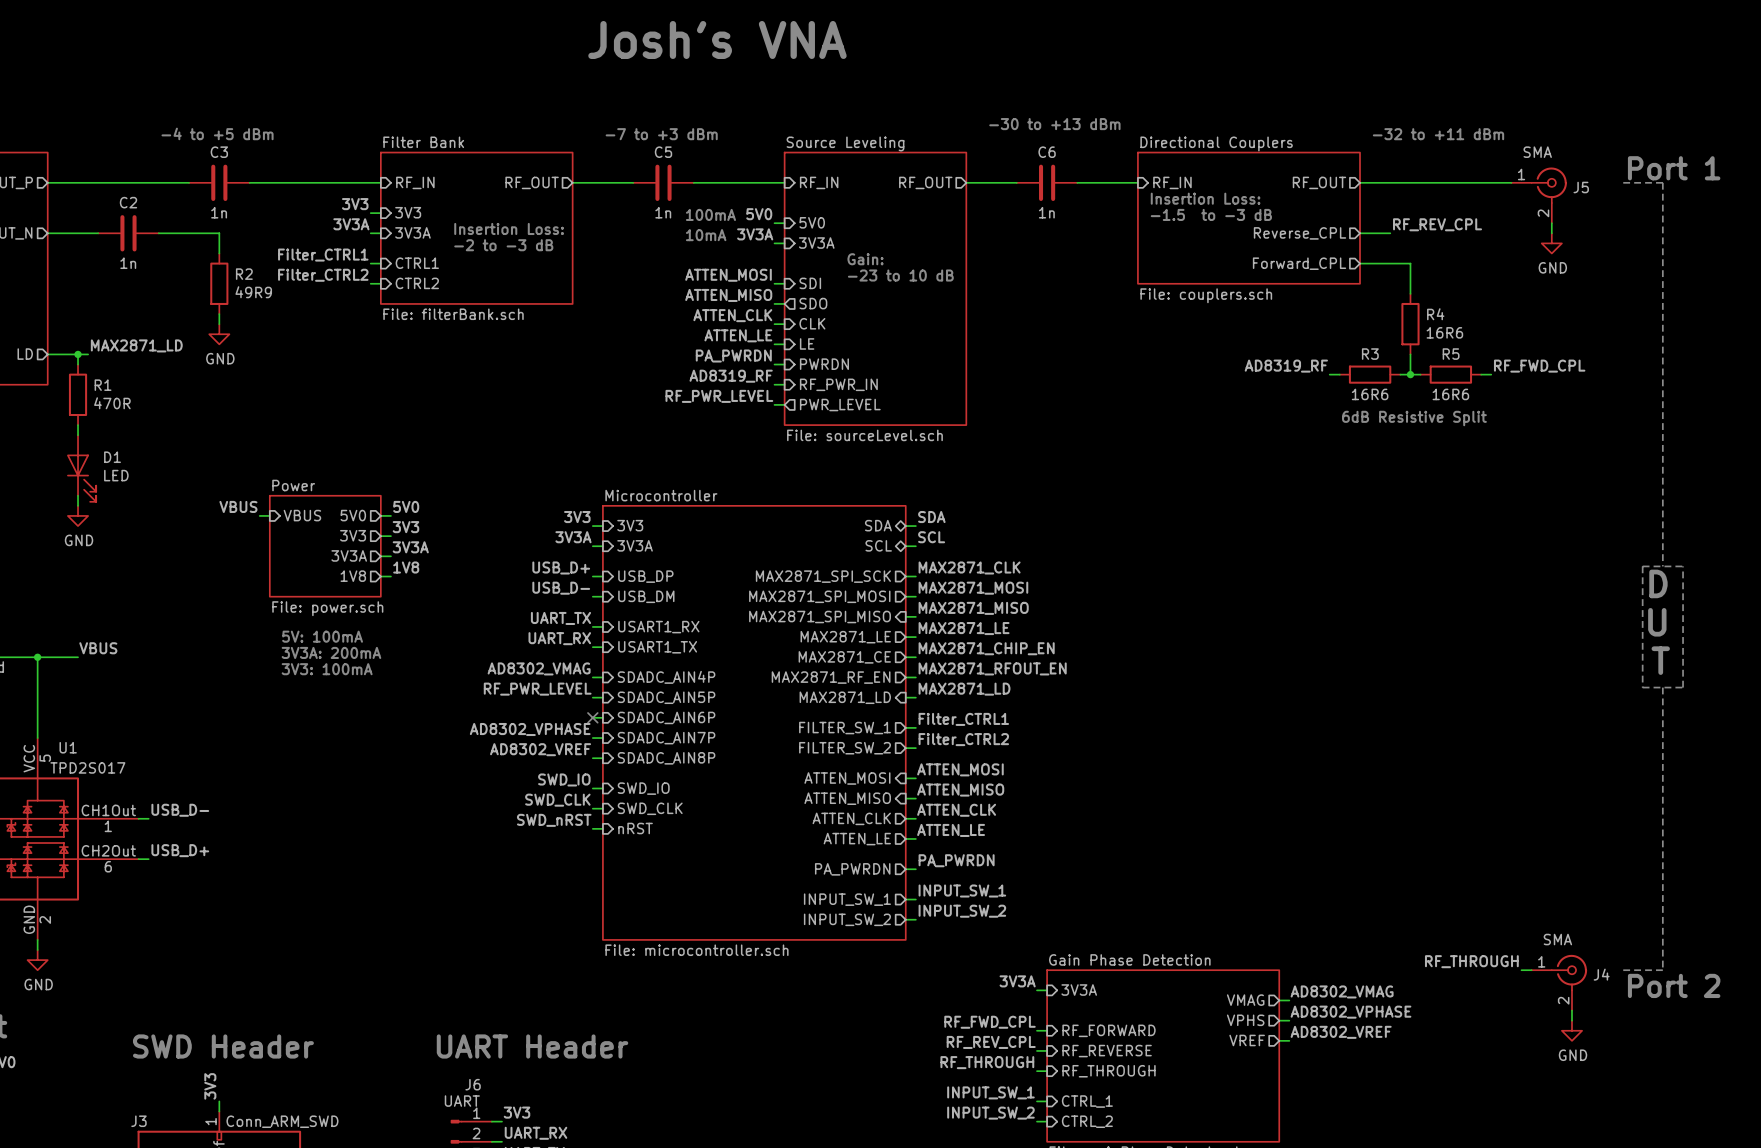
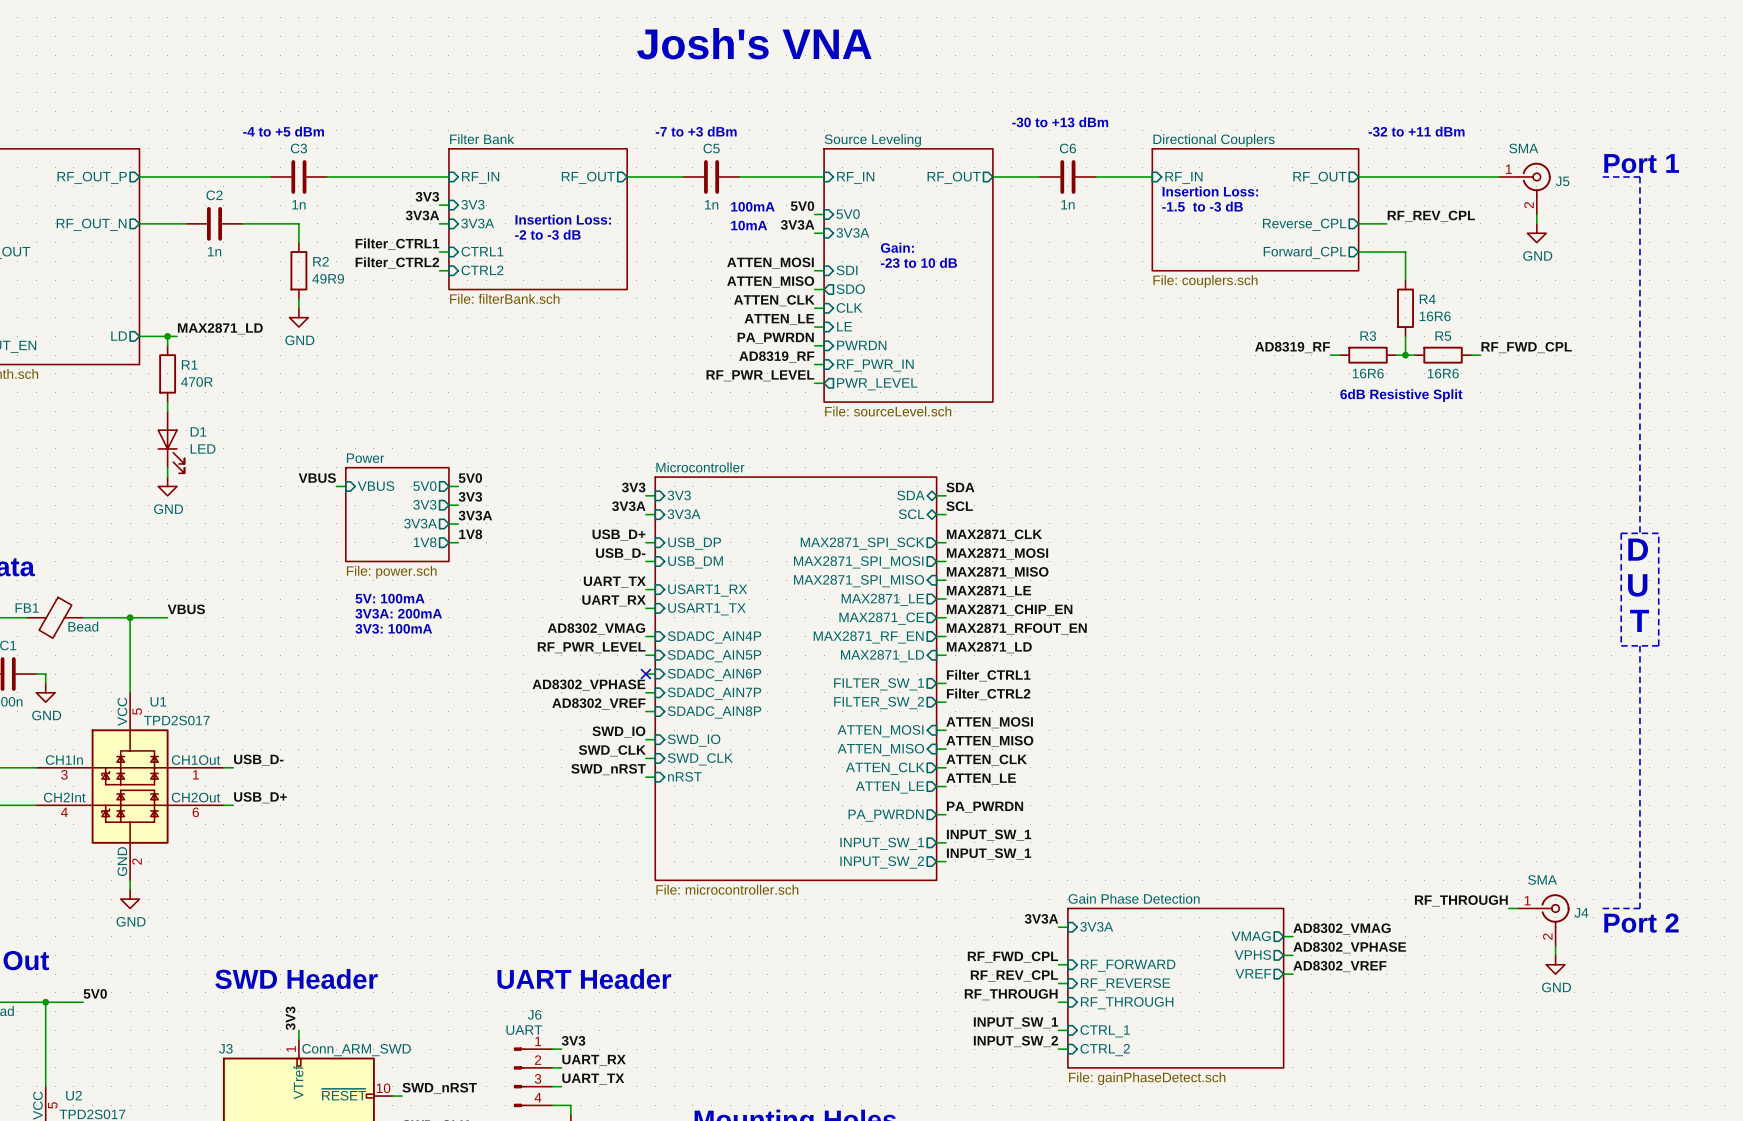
label: INPUT_SW_2 (962, 911) -> INPUT_SW_1 (989, 853)

